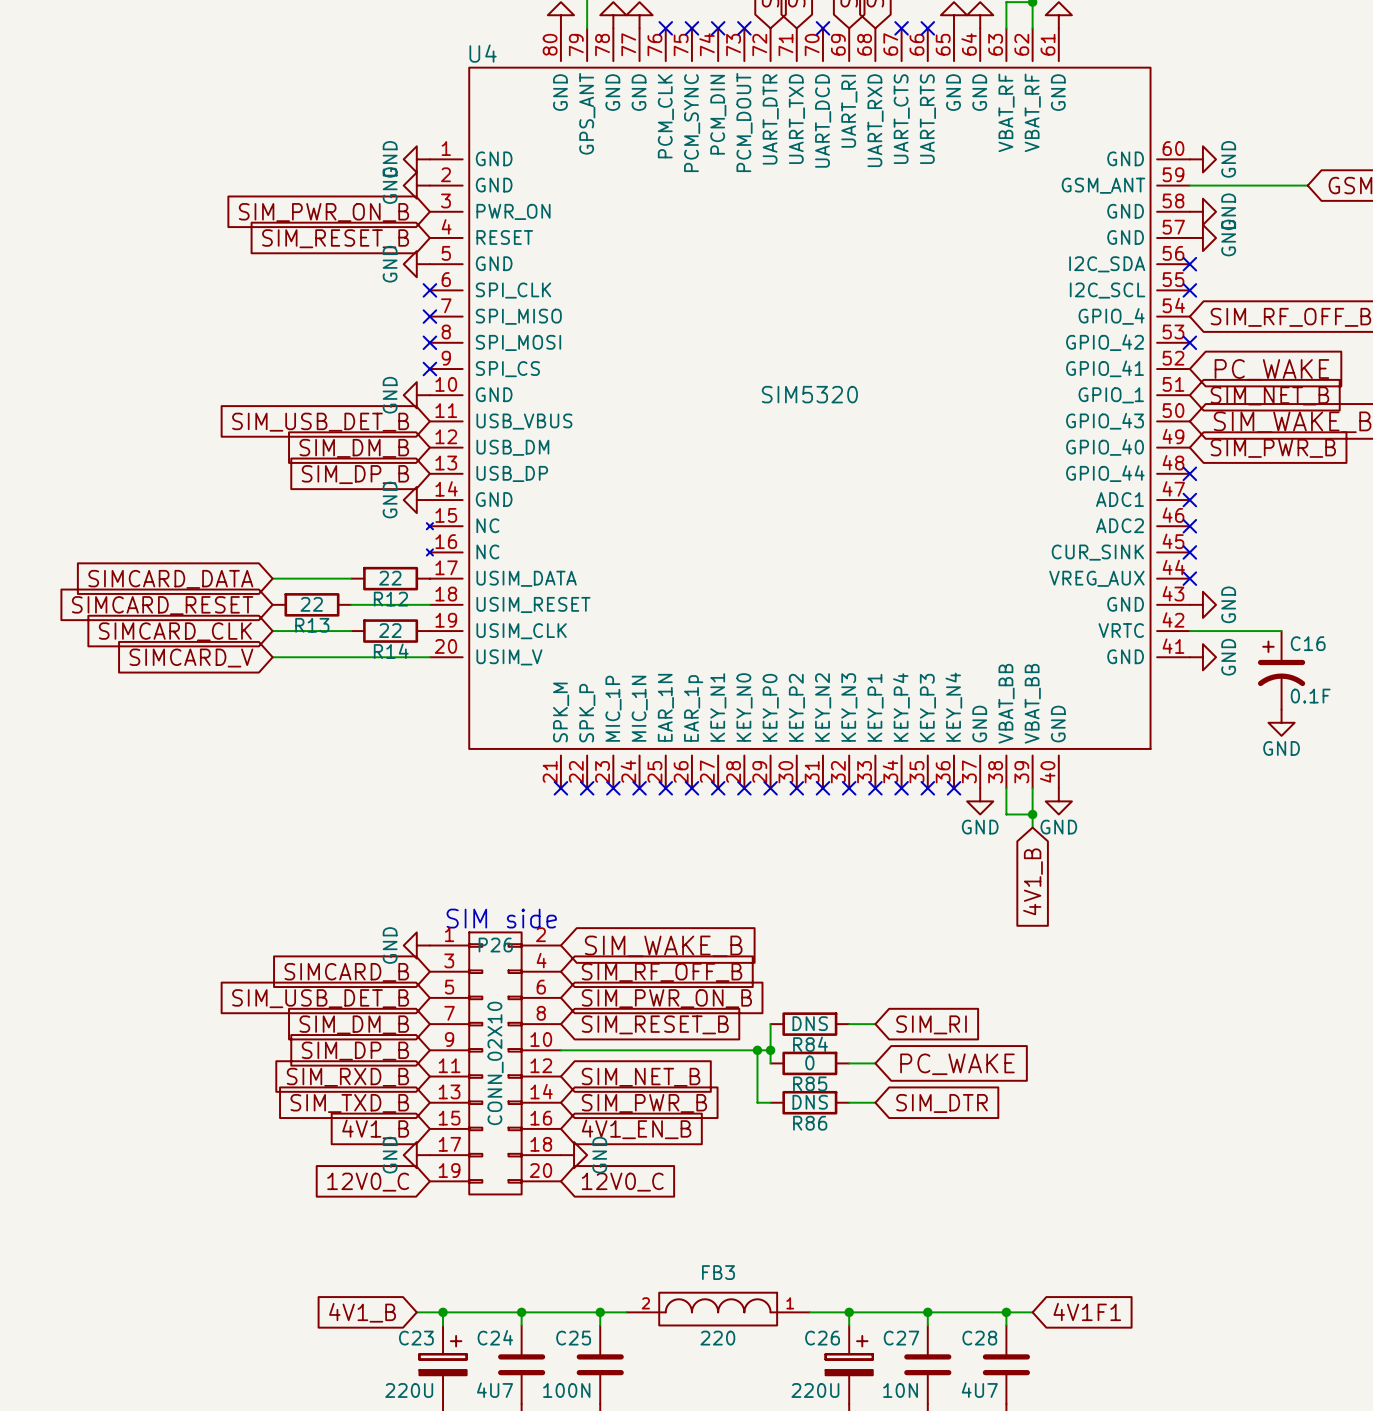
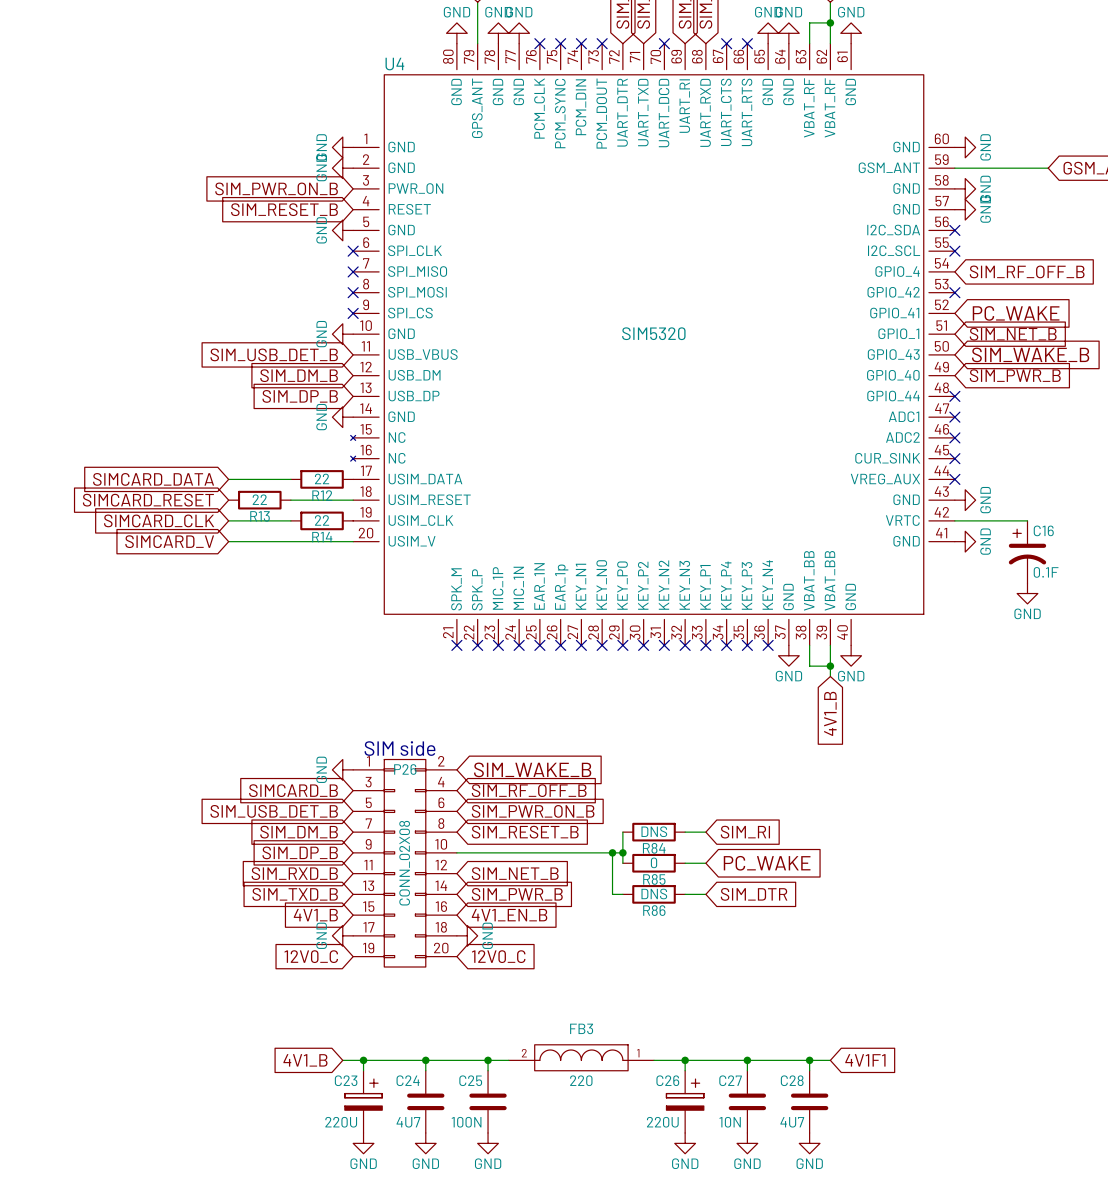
P26 value: CONN_02X10 (495, 1063) -> CONN_02X08 (404, 863)

